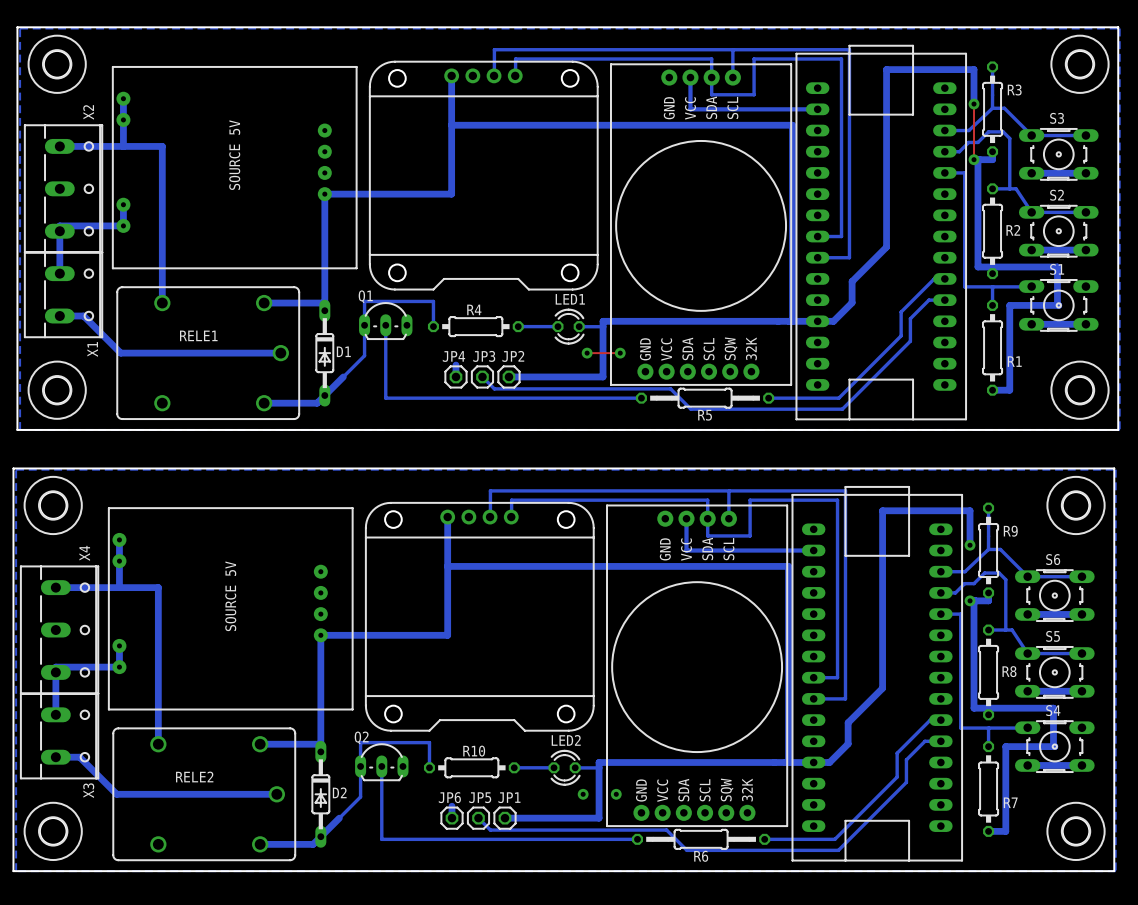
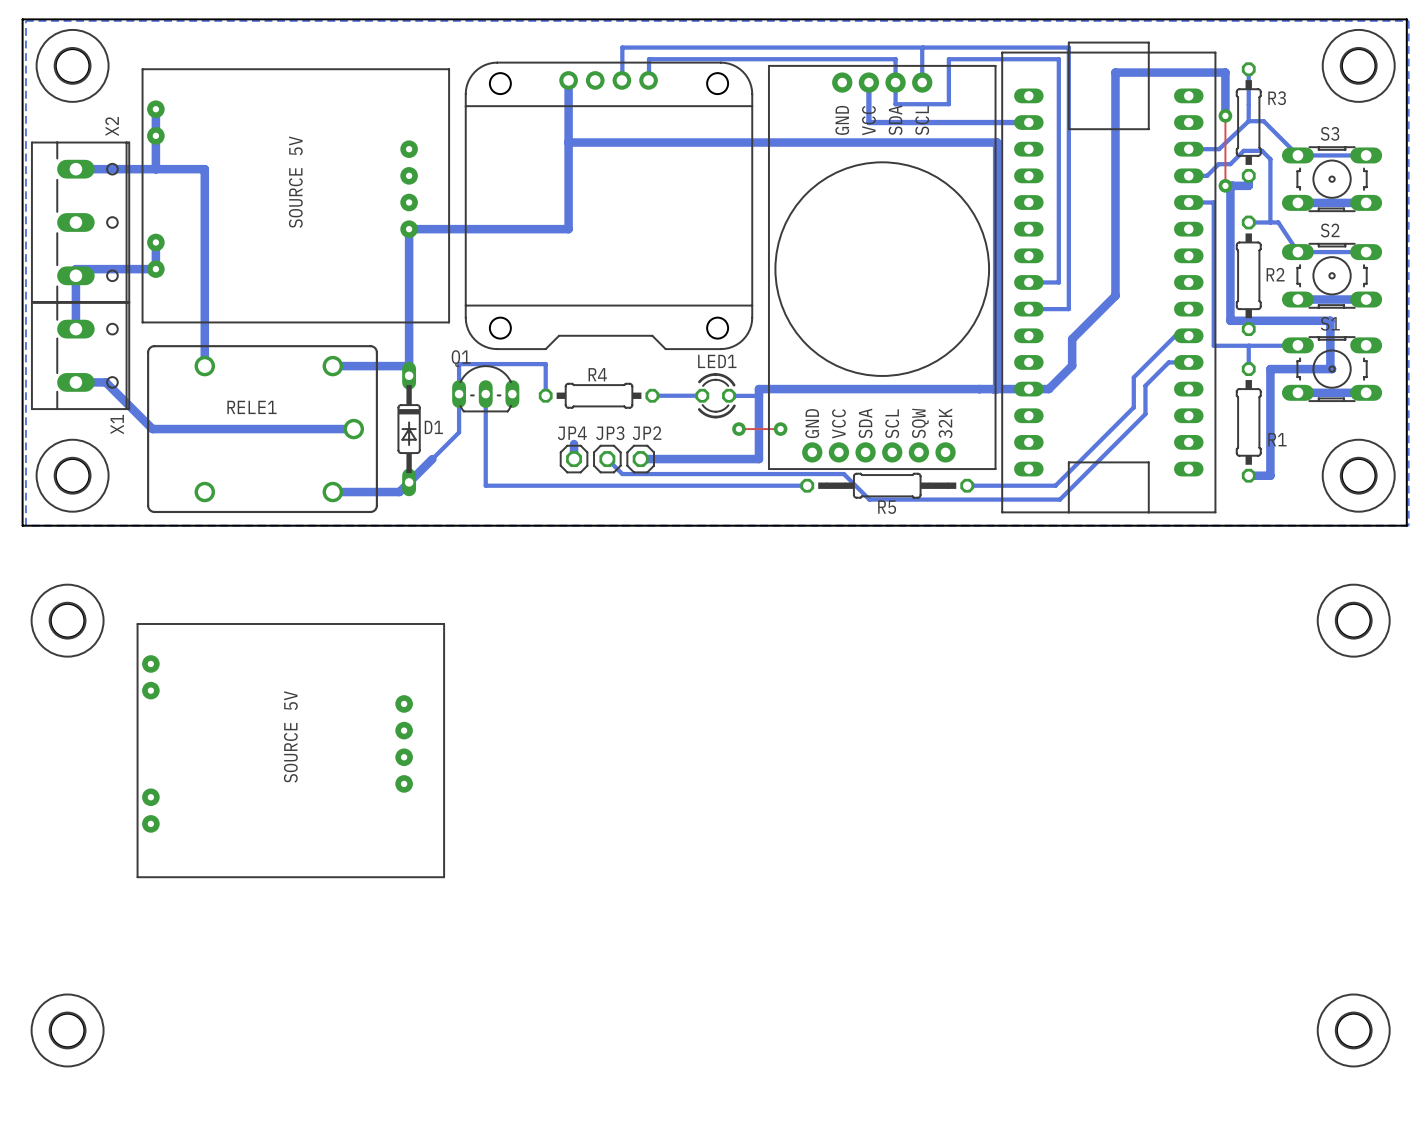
board edge: (13, 468) (1114, 468) (1114, 871) (13, 871) (13, 468) -> none
bottom zone outline: (16, 469) (1115, 469) (1115, 871) (16, 871) (16, 469) -> none
bottom track: (729, 490) (728, 518) -> none
bottom track: (988, 508) (988, 549) -> none
bottom track: (448, 517) (447, 635) (320, 635) (320, 751) -> none
bottom track: (490, 517) (490, 490) (845, 490) (845, 698) (813, 698) -> none
bottom track: (511, 517) (511, 500) (707, 500) (707, 535) (750, 535) (750, 500) (837, 500) (837, 677) (813, 677) -> none
bottom track: (686, 518) (686, 550) (813, 550) -> none
bottom track: (119, 539) (119, 587) -> none
bottom track: (970, 545) (970, 510) (882, 510) (882, 688) (848, 722) (848, 743) (829, 762) (599, 762) (599, 818) (505, 818) -> none
via: (970, 545) -> none
bottom track: (988, 549) (964, 571) (940, 571) -> none
bottom track: (988, 549) (1000, 549) (1027, 576) (1081, 576) -> none
R9: (988, 550) -> none
bottom track: (447, 566) (788, 566) (788, 762) -> none
bottom track: (55, 587) (158, 587) (158, 744) -> none
bottom track: (940, 592) (955, 592) (964, 583) (974, 583) (984, 573) (999, 573) (1005, 579) (1005, 630) -> none
bottom track: (988, 592) (988, 600) (970, 600) -> none
S6: (1054, 595) -> none
via: (970, 600) -> none
bottom track: (975, 600) (974, 602) (974, 708) (1053, 708) (1054, 746) (1005, 746) (1005, 831) (988, 831) -> none
bottom track: (940, 614) (960, 614) (960, 728) (1027, 727) -> none
bottom track: (1027, 614) (1081, 614) -> none
part: (479, 616) -> none
X4: (59, 630) -> none
bottom track: (988, 630) (1012, 630) (1027, 653) (1081, 653) -> none
bottom track: (119, 645) (119, 667) (55, 667) (55, 714) -> none
part: (697, 665) -> none
R8: (988, 672) -> none
S5: (1054, 672) -> none
part: (877, 673) -> none
bottom track: (1027, 691) (1081, 691) -> none
bottom track: (940, 720) (930, 720) (897, 753) (897, 777) (834, 839) (764, 839) -> none
bottom track: (988, 728) (988, 746) -> none
X3: (59, 736) -> none
bottom track: (940, 741) (924, 741) (906, 759) (906, 782) (838, 850) (686, 850) (666, 830) (490, 830) (478, 818) -> none
bottom track: (260, 744) (320, 744) -> none
S4: (1054, 746) -> none
bottom track: (55, 757) (79, 757) (116, 794) (276, 794) -> none
Q2: (381, 762) -> none
bottom track: (1027, 765) (1081, 765) -> none
bottom track: (381, 766) (381, 839) (637, 839) -> none
bottom track: (429, 767) (429, 742) (360, 742) (360, 796) (313, 844) (260, 844) -> none
R10: (471, 767) -> none
bottom track: (514, 767) (554, 767) -> none
LED2: (564, 767) -> none
bottom track: (575, 767) (599, 767) -> none
R7: (988, 789) -> none
RELE2: (204, 794) -> none
D2: (320, 794) -> none
via: (583, 794) -> none
via: (616, 794) -> none
bottom track: (452, 806) (452, 818) -> none
JP6: (452, 818) -> none
JP5: (478, 818) -> none
JP1: (505, 818) -> none
R6: (701, 839) -> none

